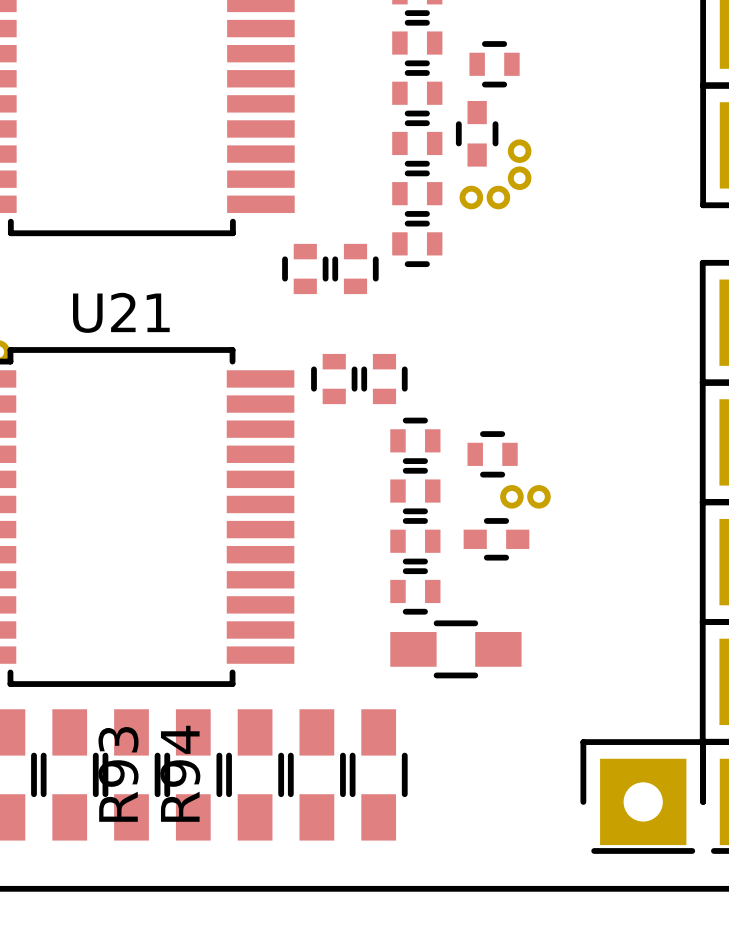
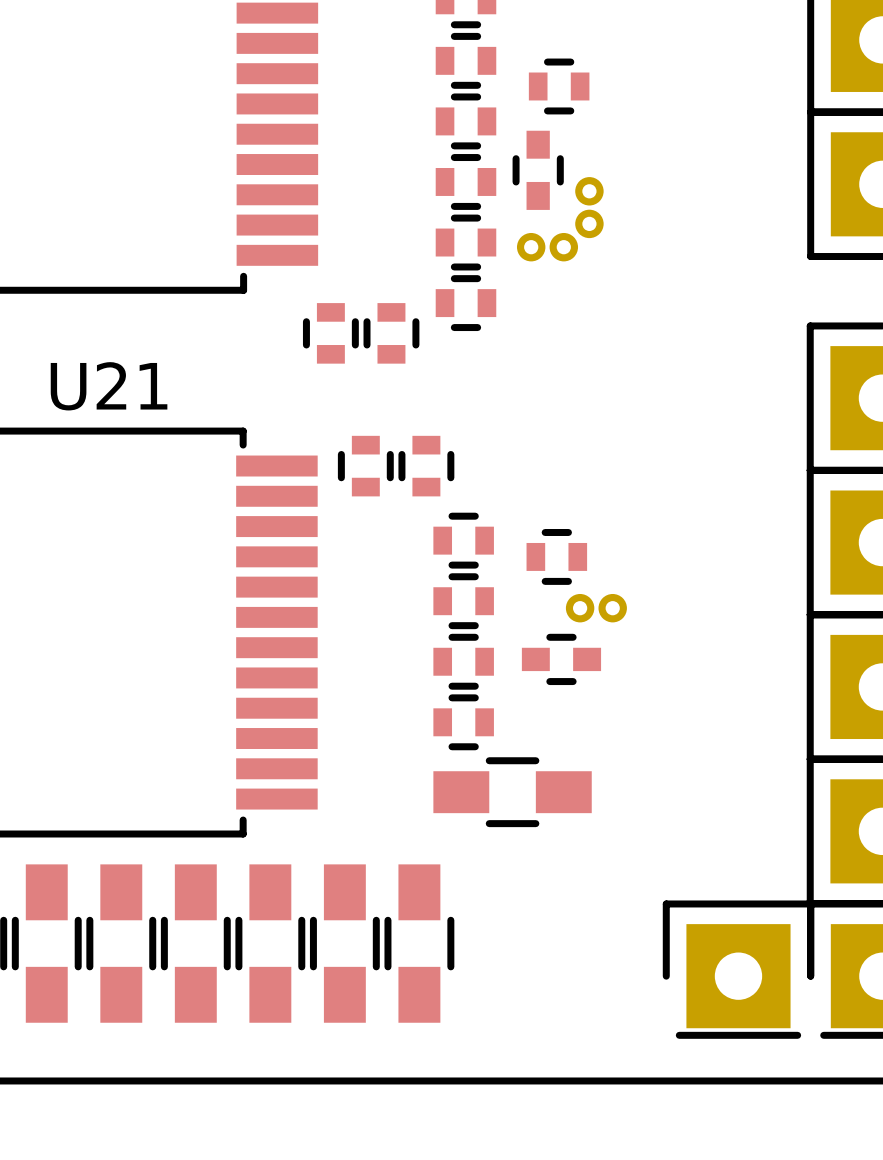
R94 name: R94 (180, 773) -> none
R93 name: R93 (118, 774) -> none

